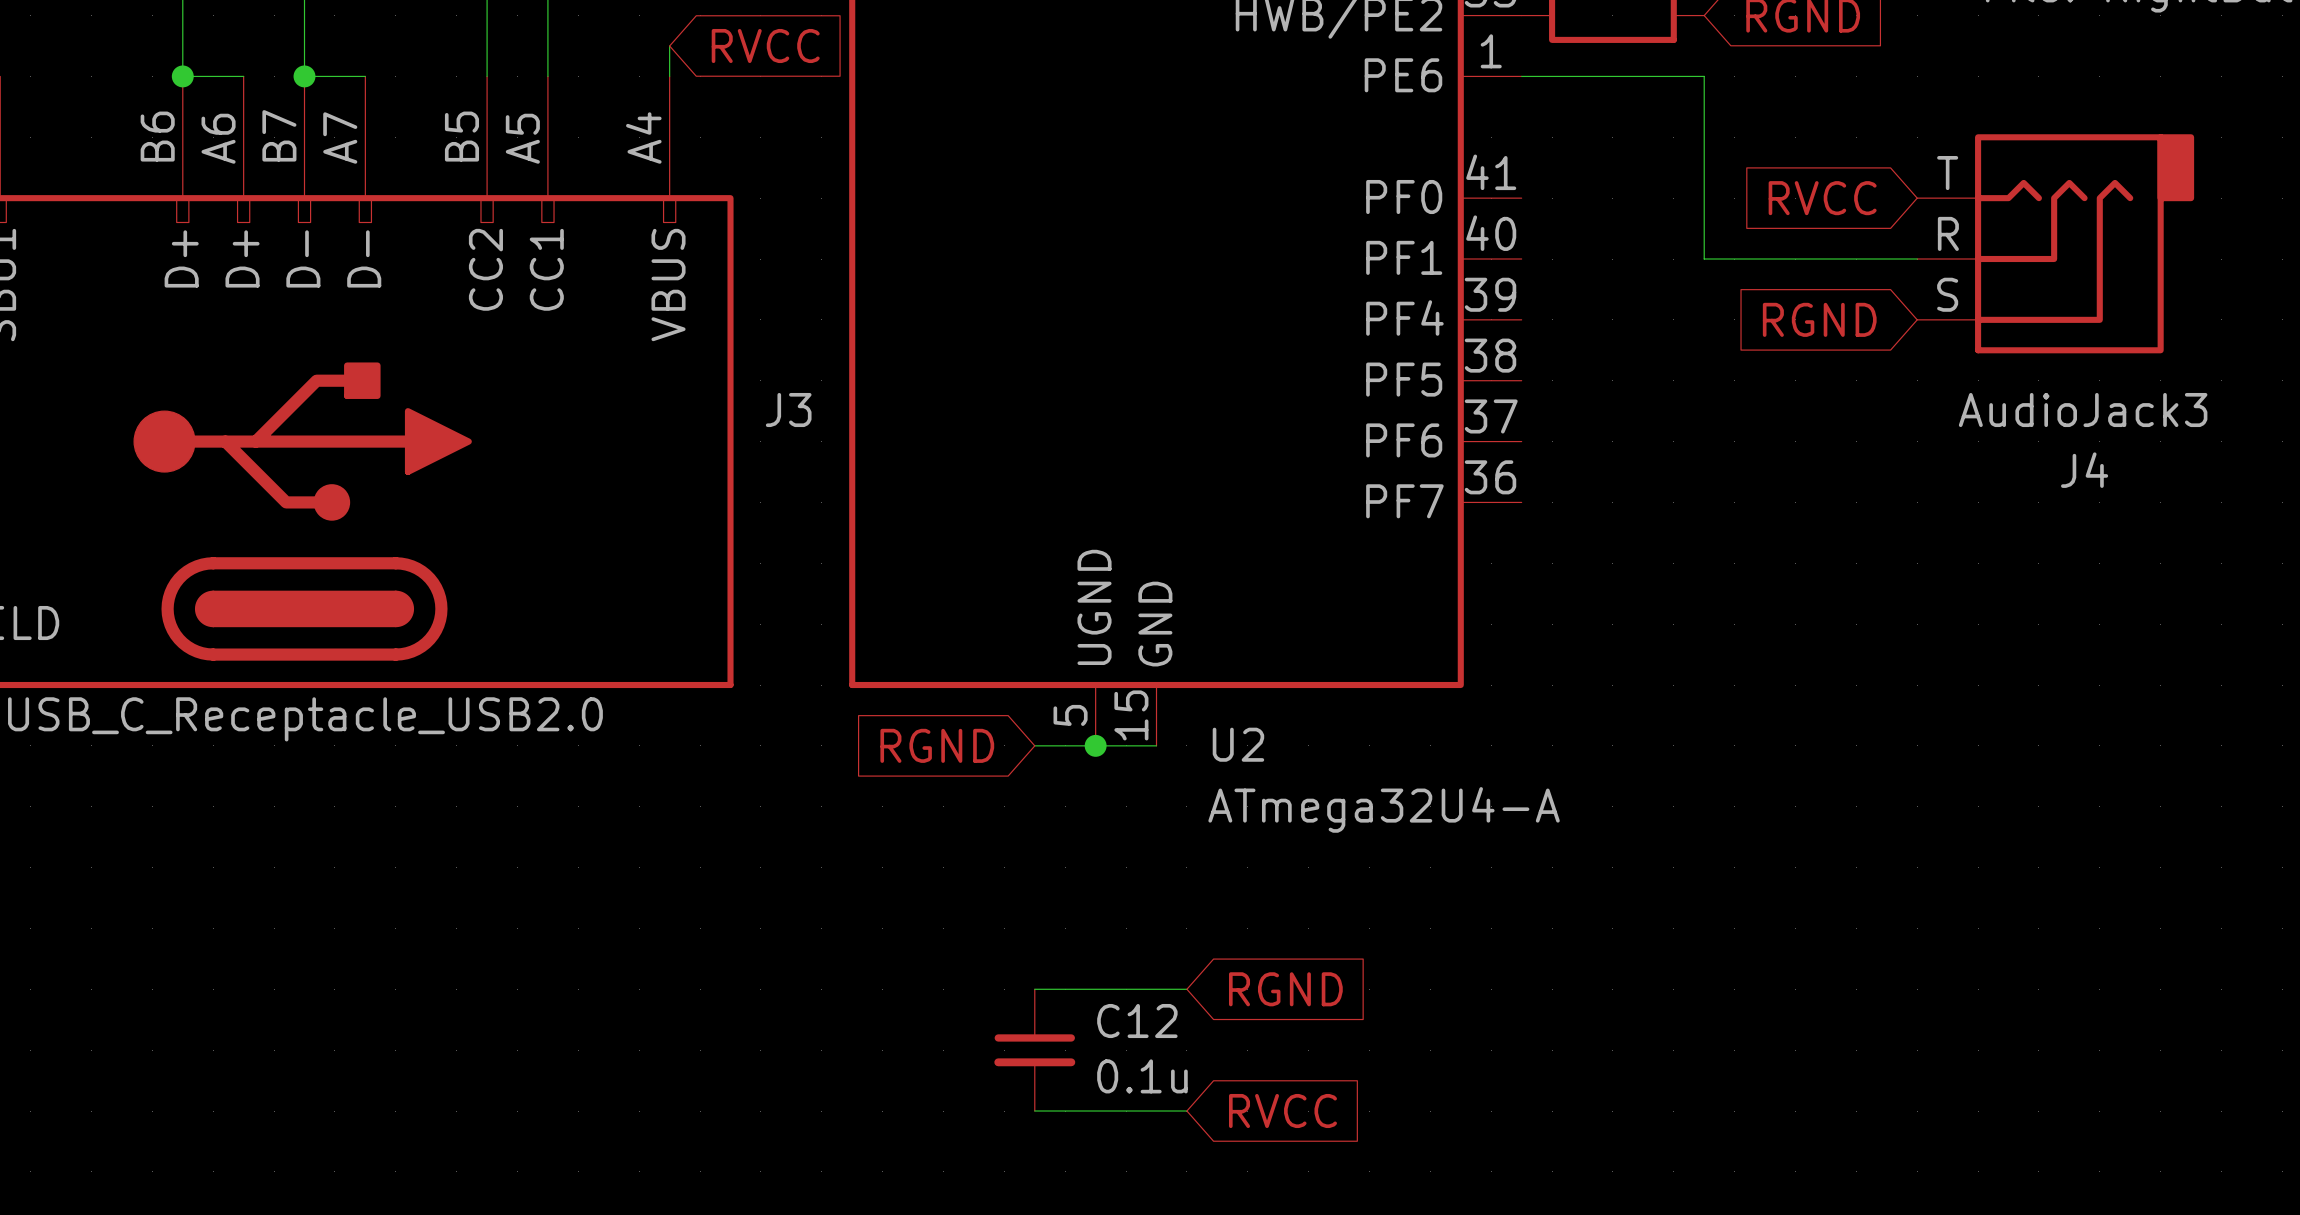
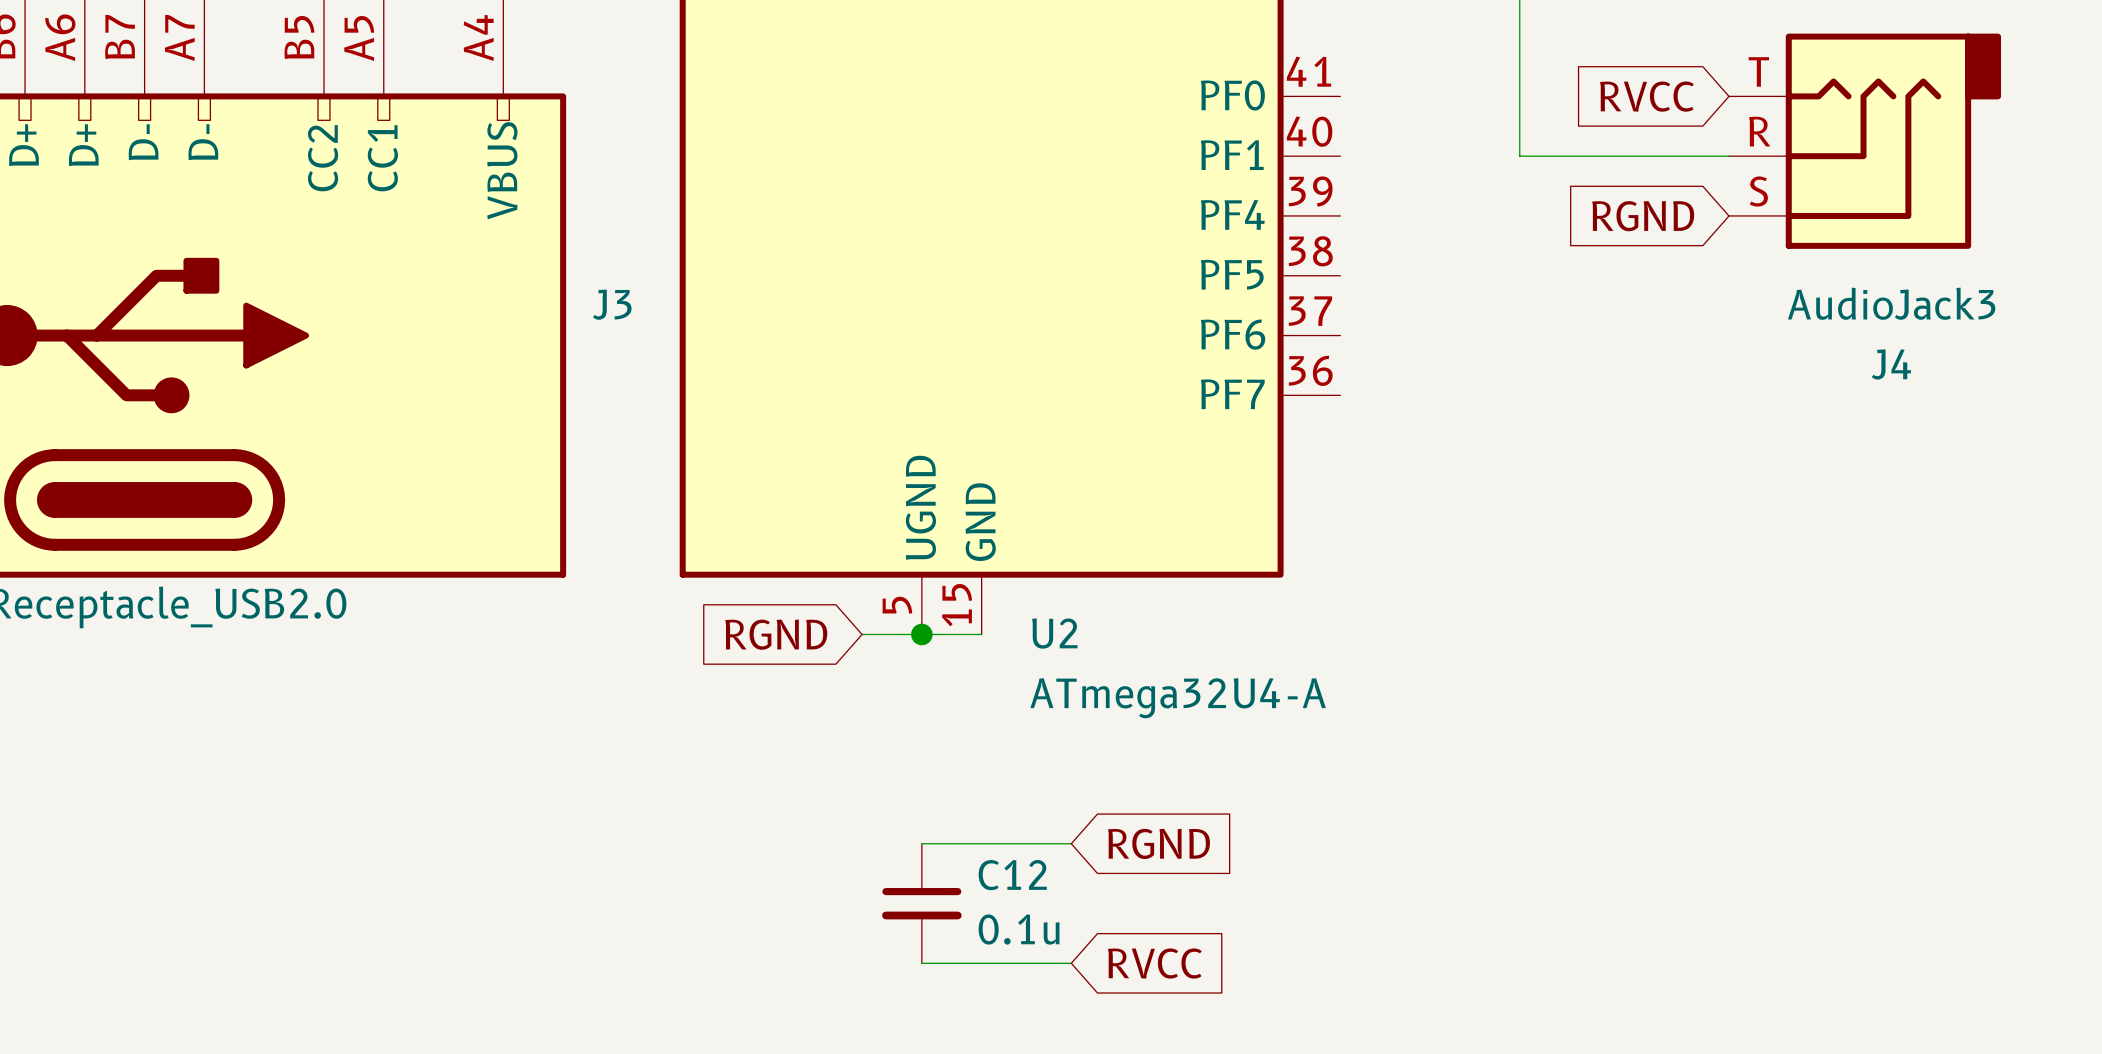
wire: (1034, 989) (1186, 989) -> (921, 843) (1071, 843)
global label position: RGND (1285, 989) -> RGND (1158, 843)
C12 position: (1034, 1050) -> (921, 903)
wire: (1034, 1111) (1186, 1111) -> (921, 963) (1071, 963)
global label position: RVCC (1282, 1111) -> RVCC (1154, 963)

